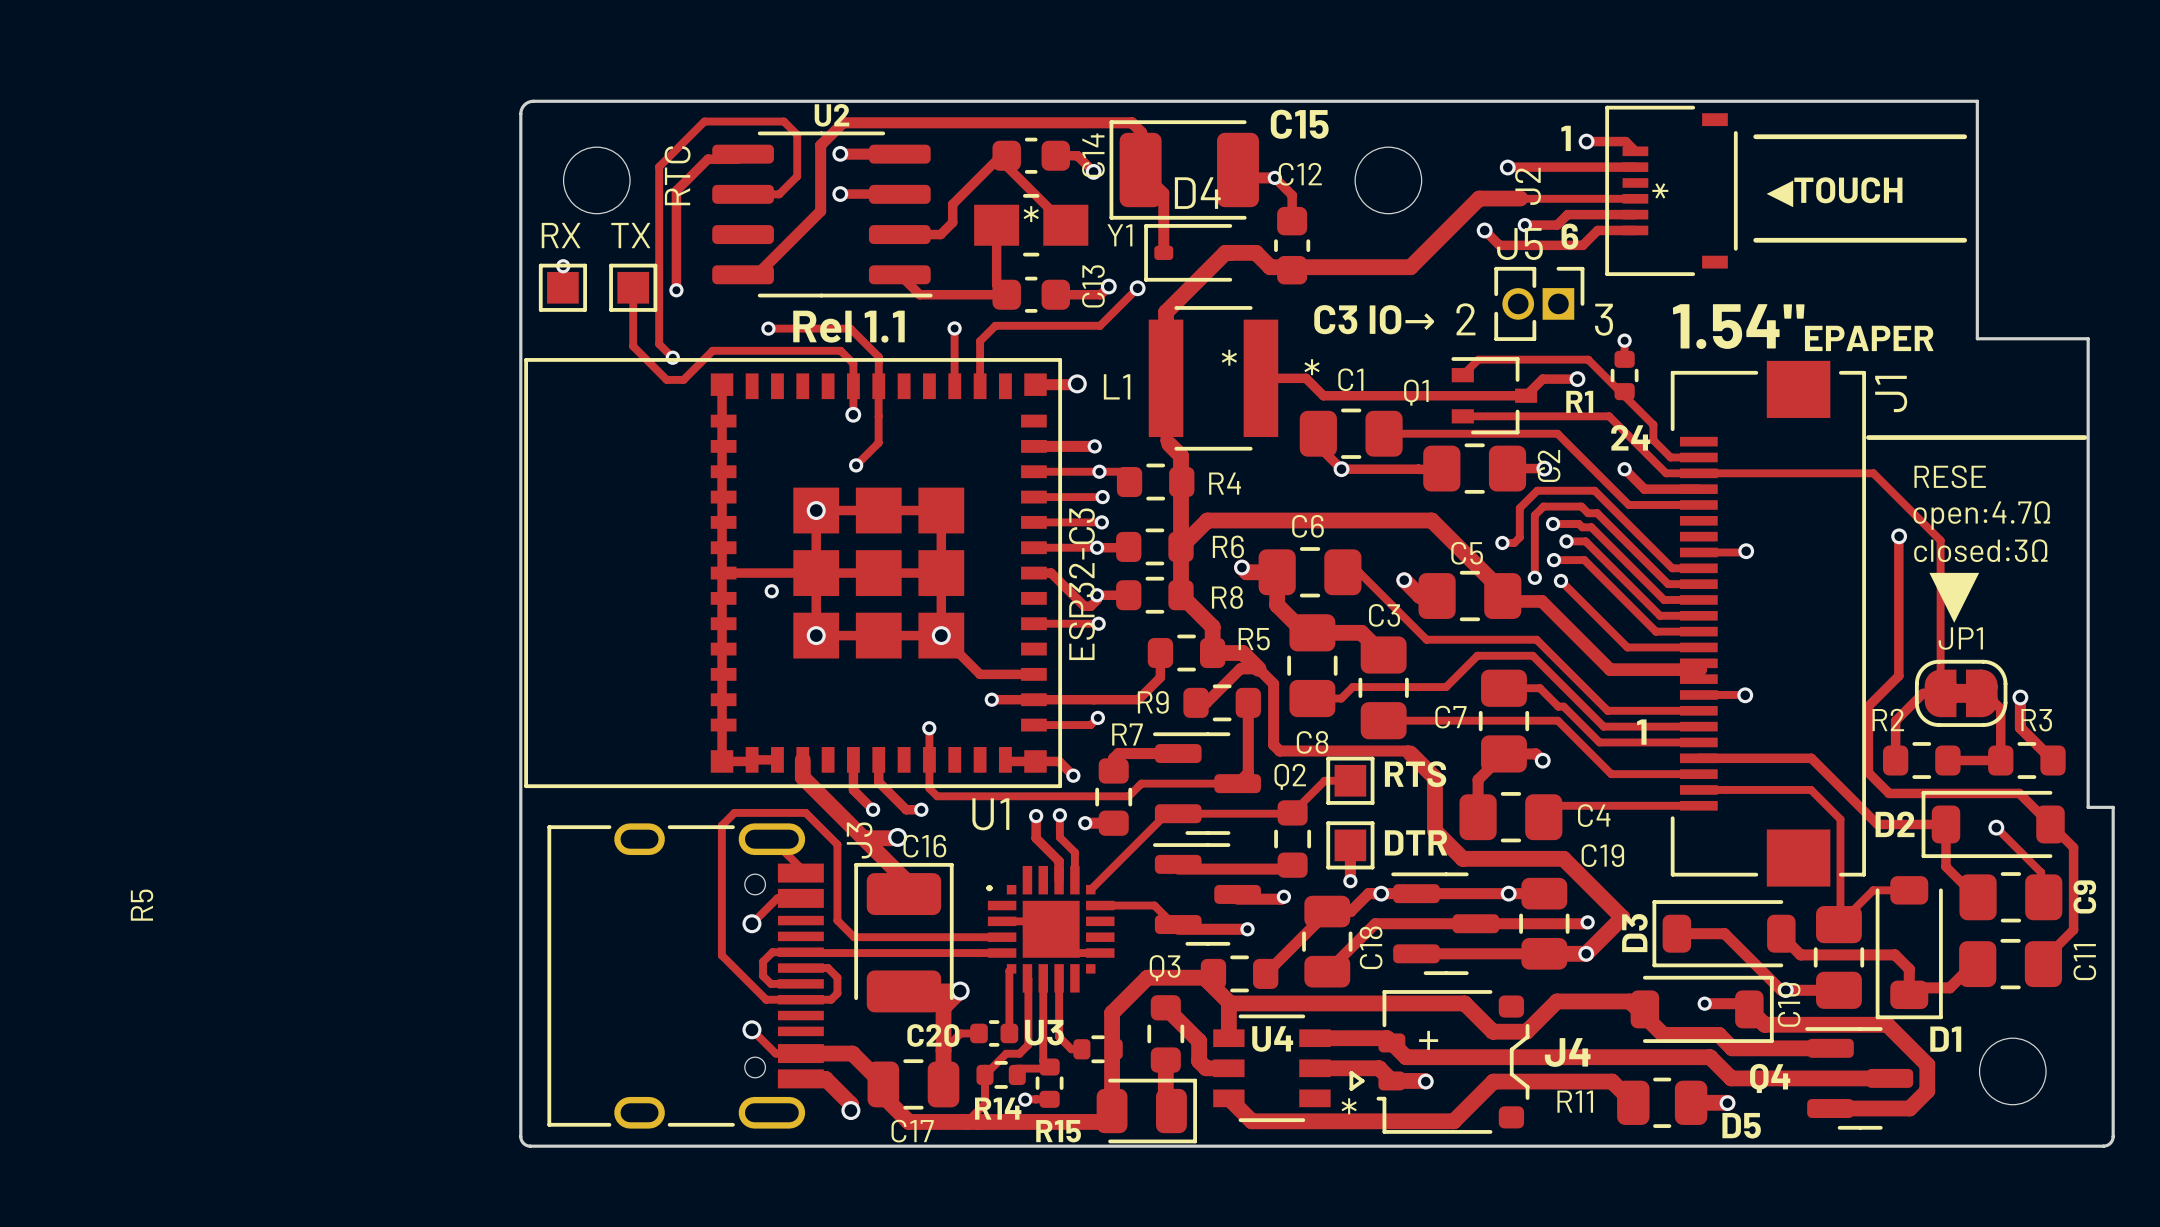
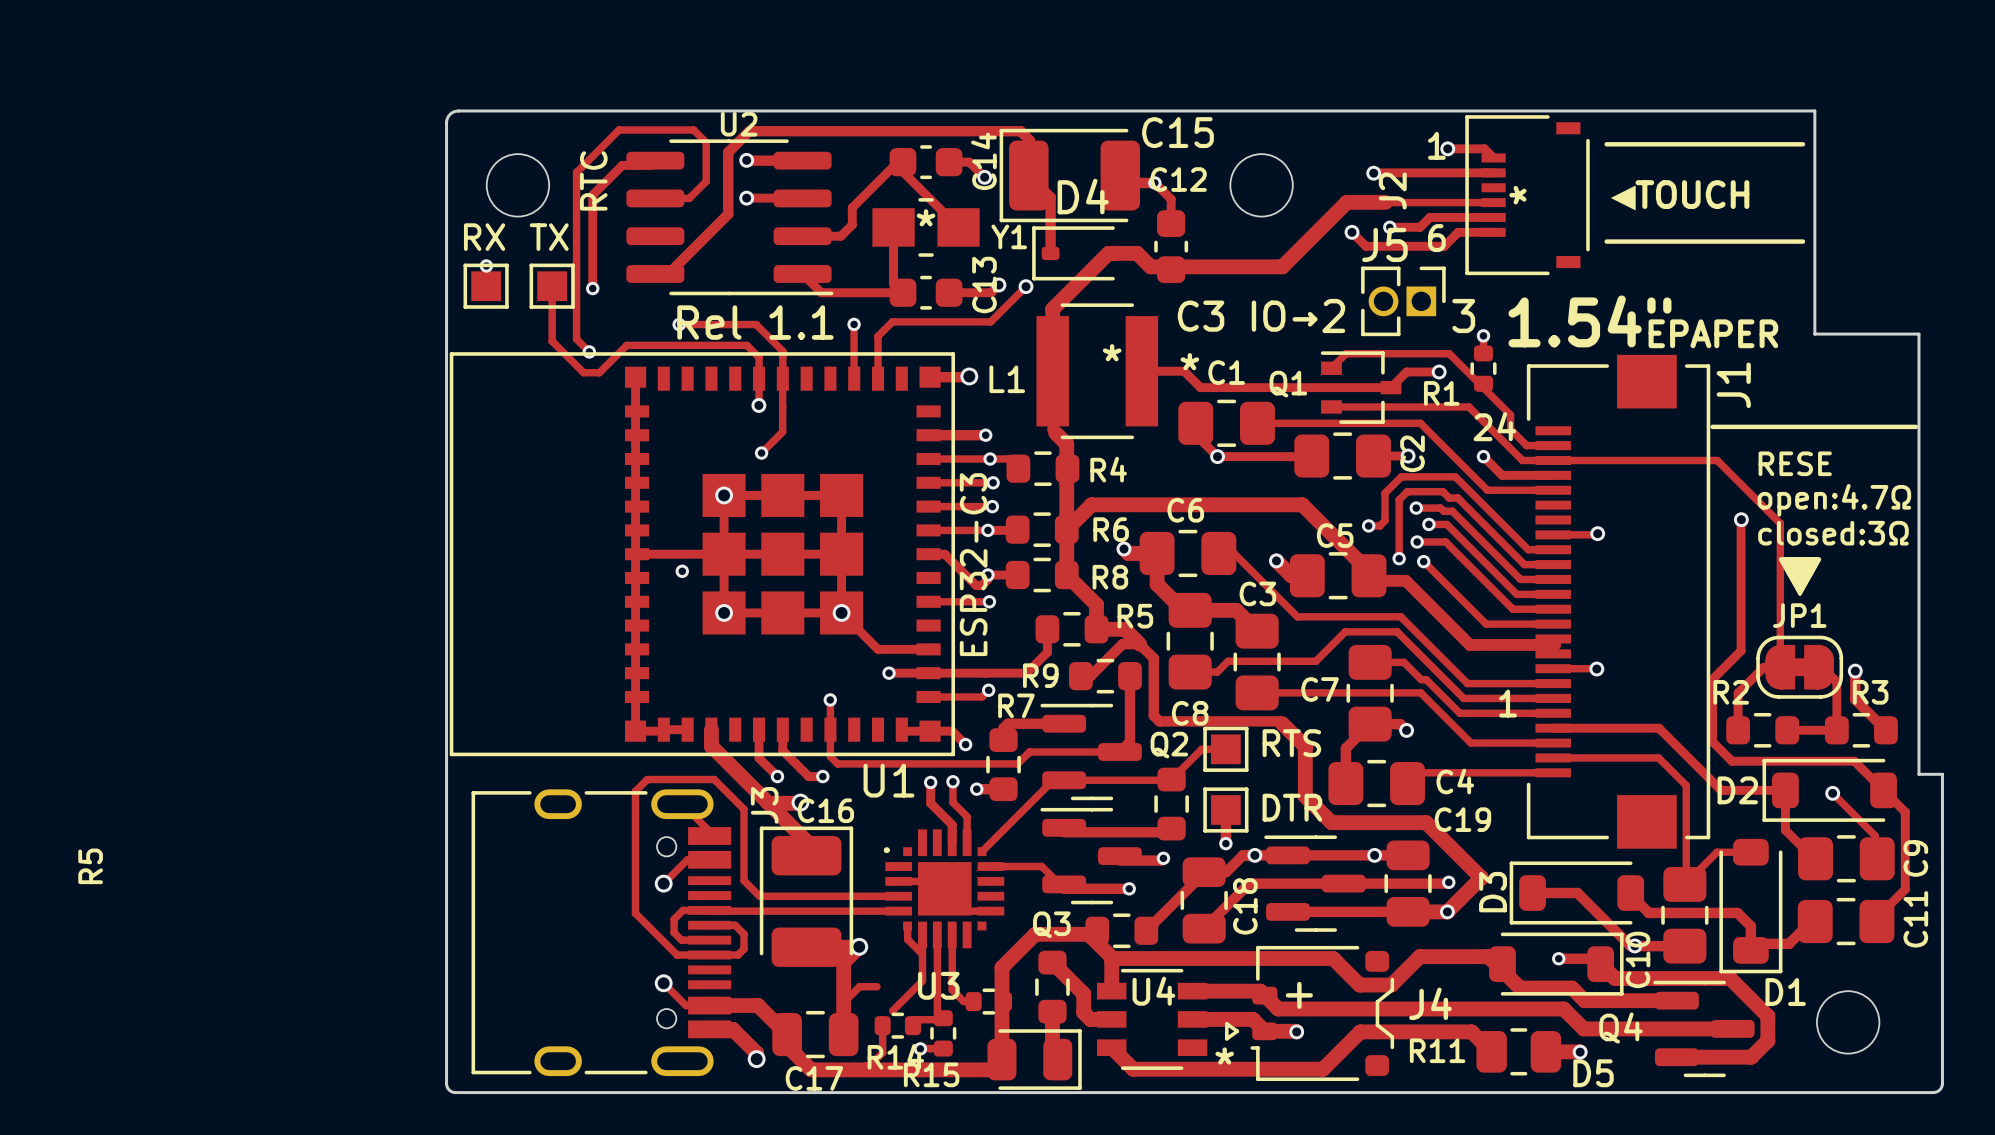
track: (1011, 968) (1009, 971) (1009, 1033) -> (907, 926) (907, 939) (922, 954)
track: (1027, 978) (1028, 1044) (1019, 1053) (1006, 1053) (985, 1074) -> (922, 934) (922, 981) (892, 1010)
C20: (994, 1033) -> none
R15 name position: R15 (1058, 1131) -> R15 (931, 1074)

